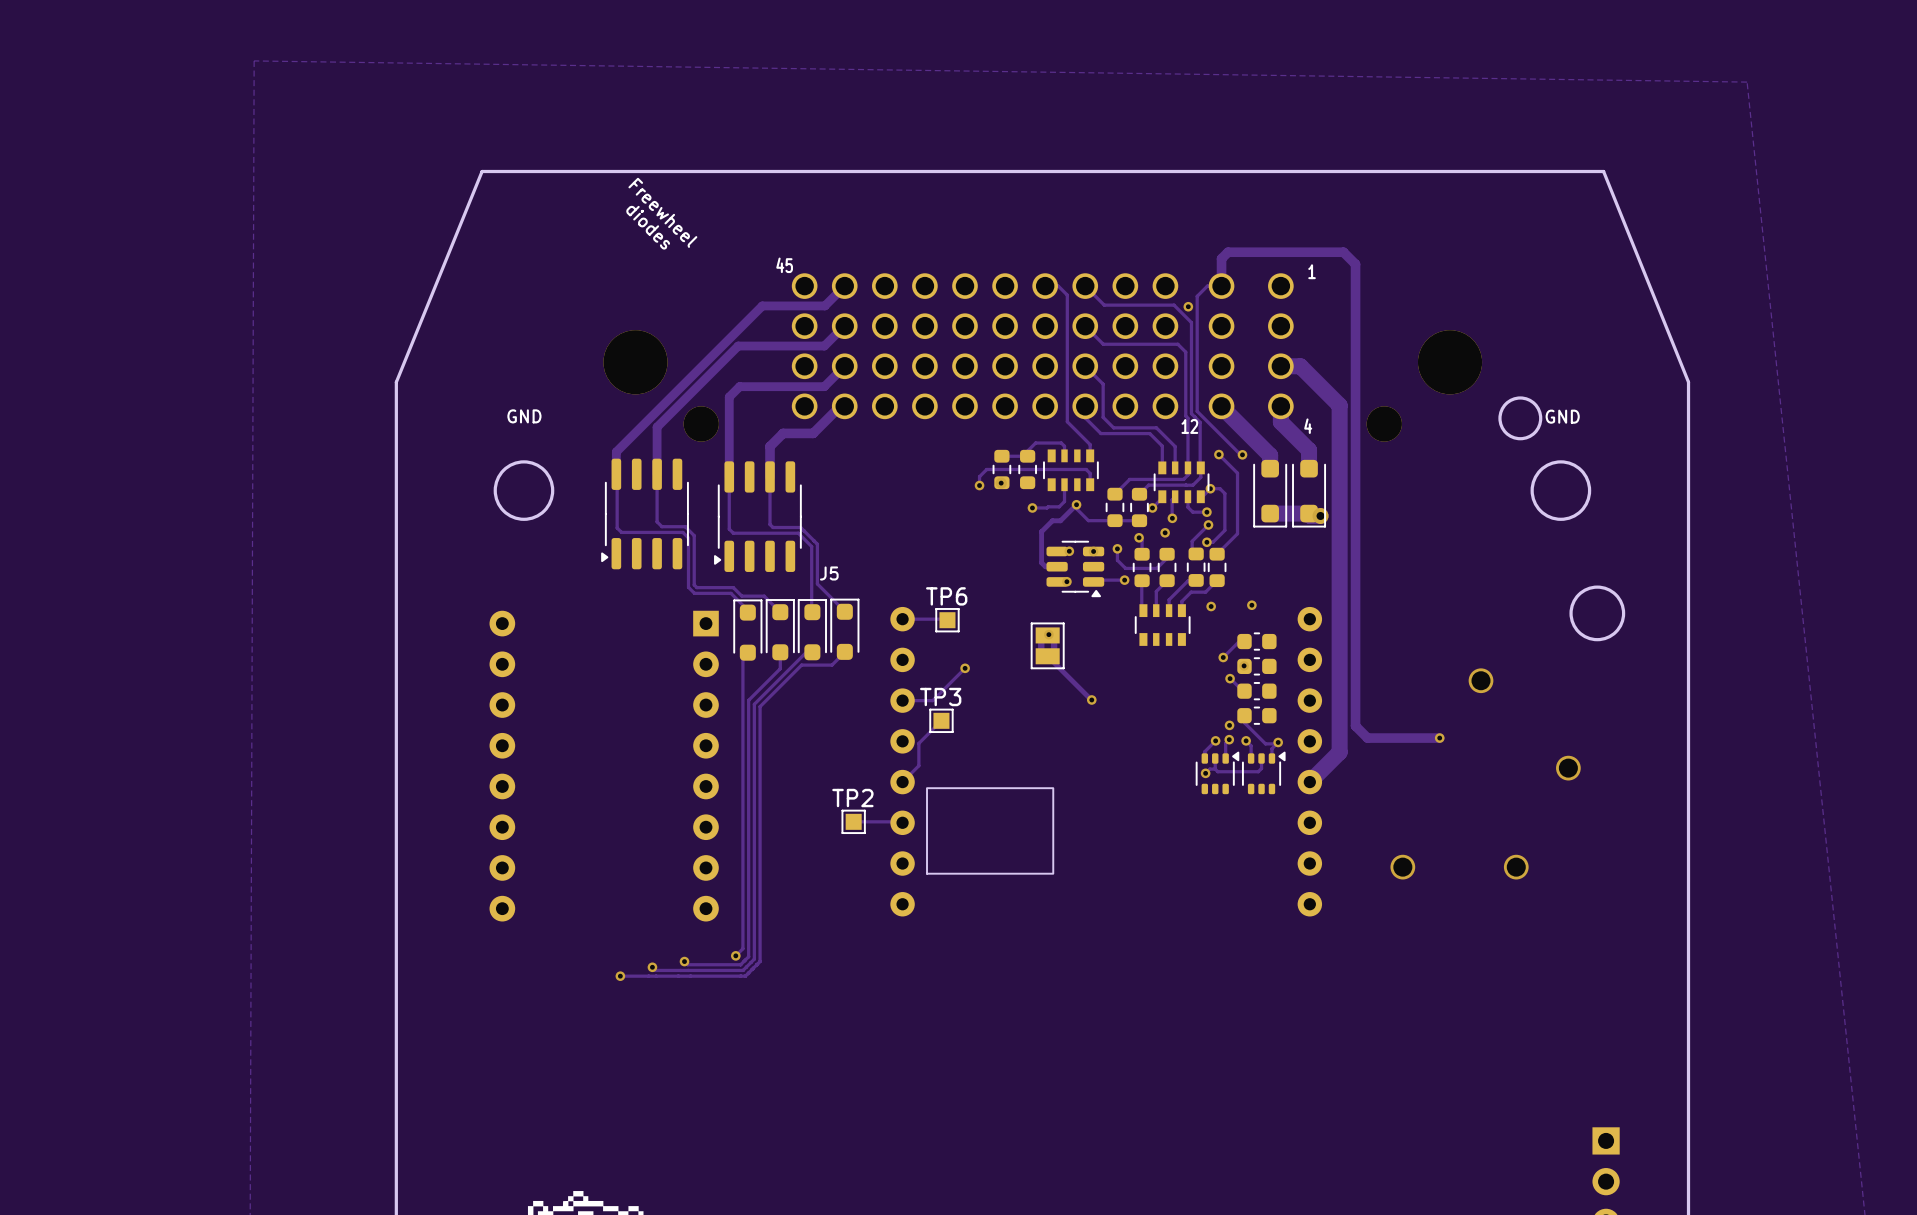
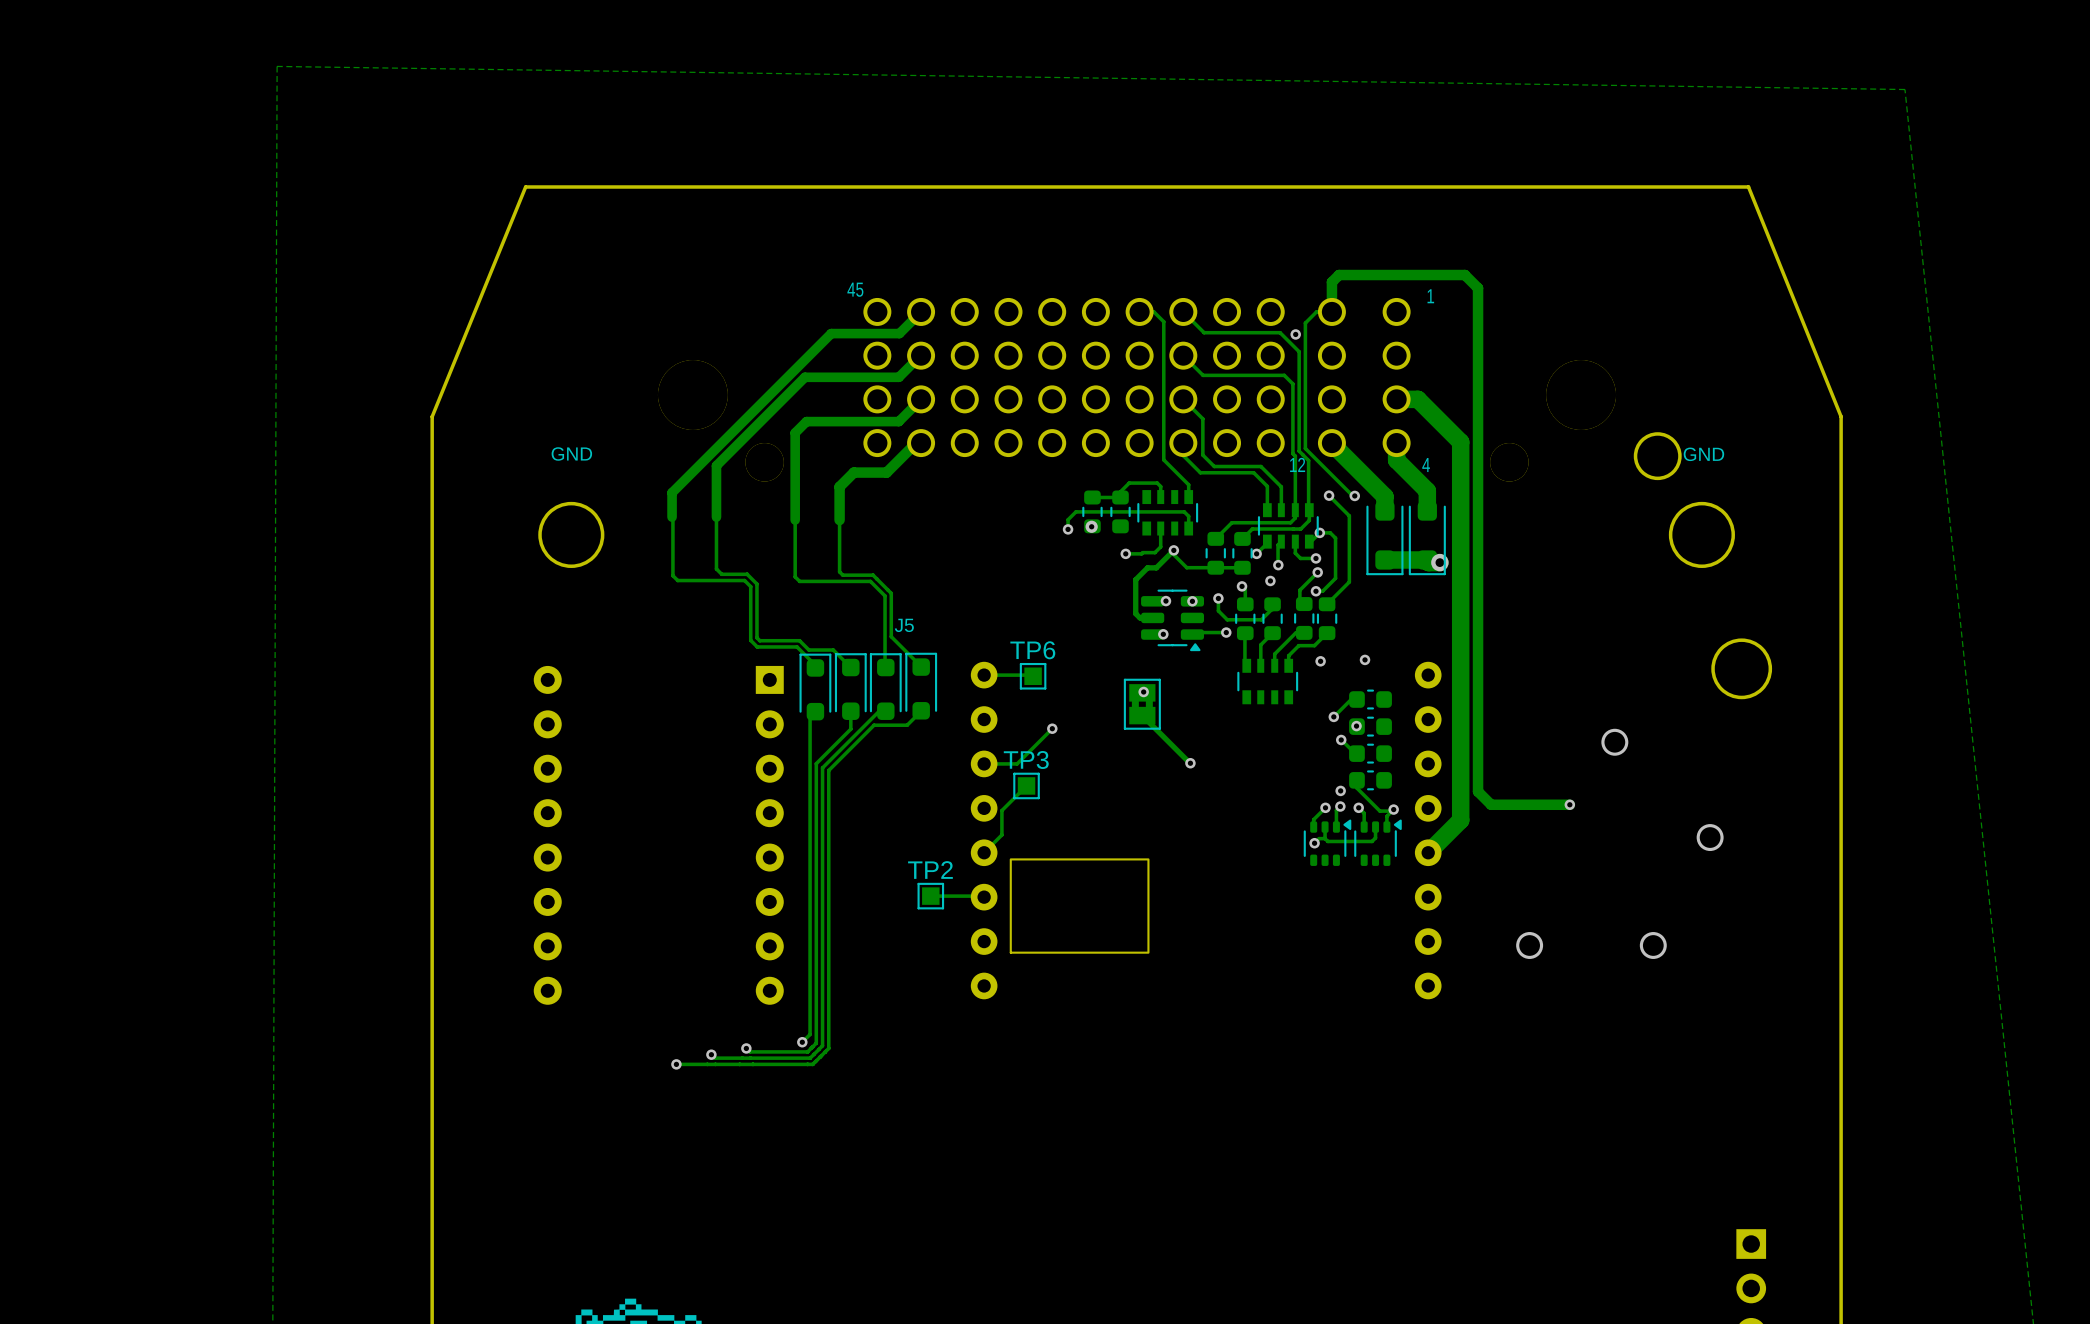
text: Freewheel (662, 212) -> none
text: diodes (648, 227) -> none
part: (645, 513) -> none
part: (757, 516) -> none

